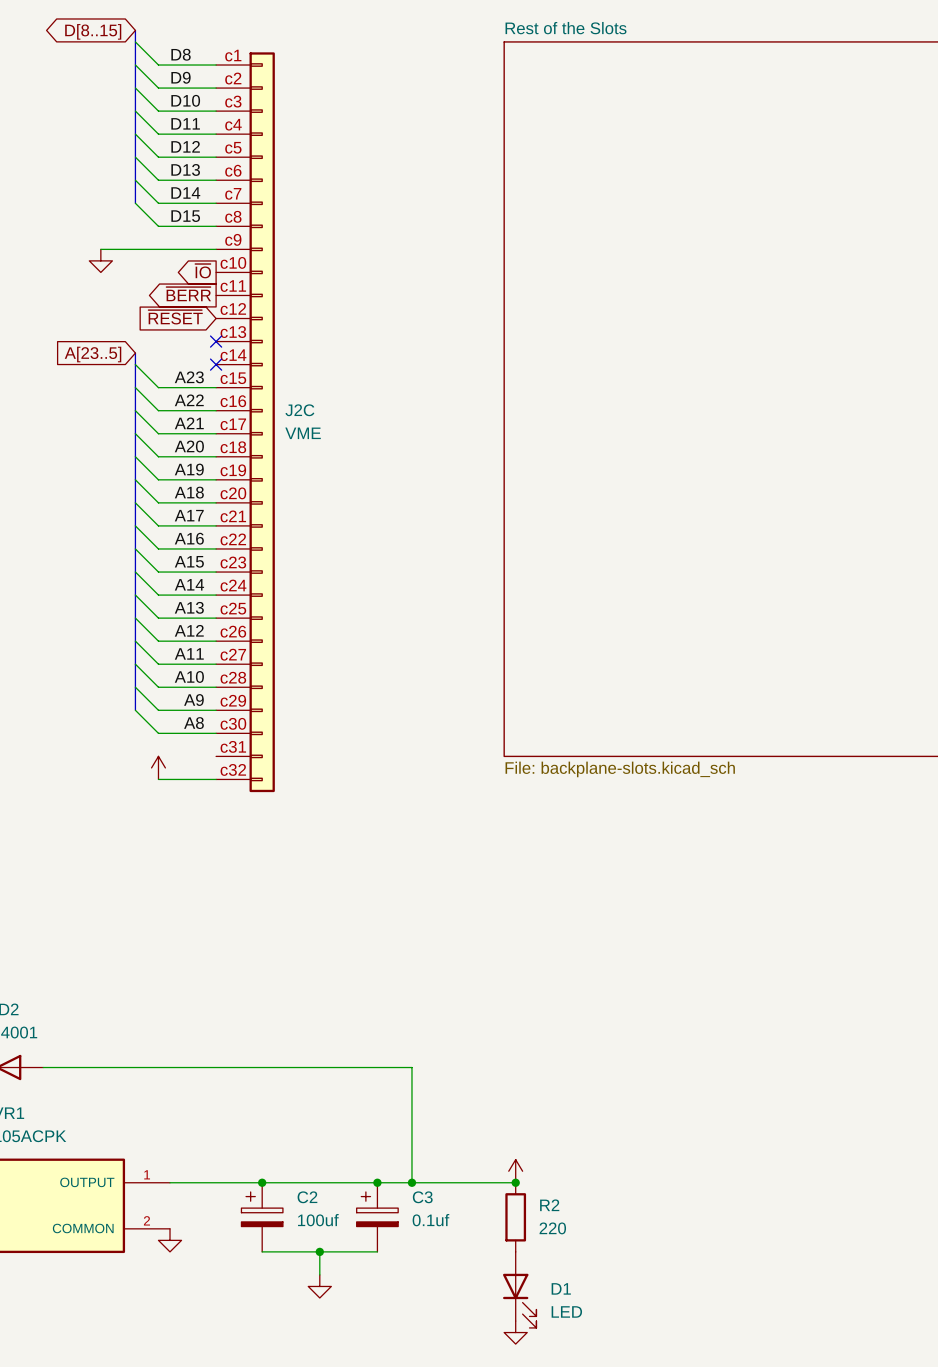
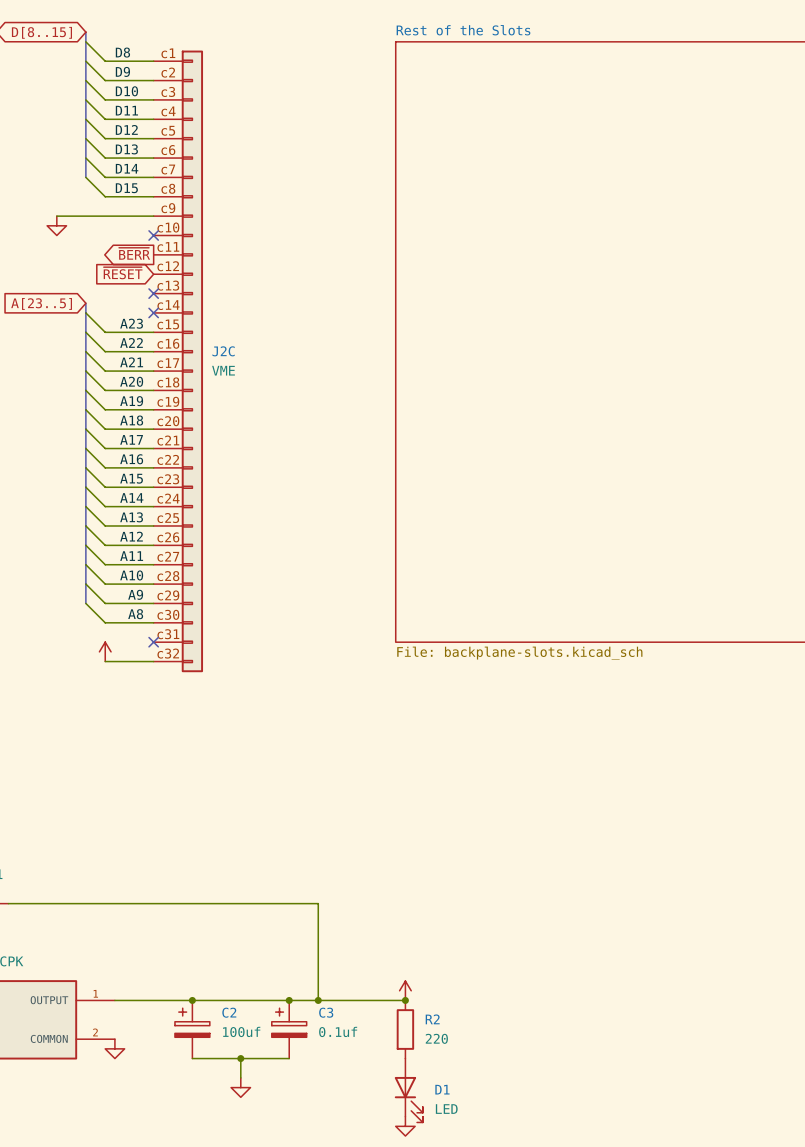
global label: ~{IO} (203, 271) -> none
no-connect mark: none -> (153, 235)
no-connect mark: none -> (153, 642)

